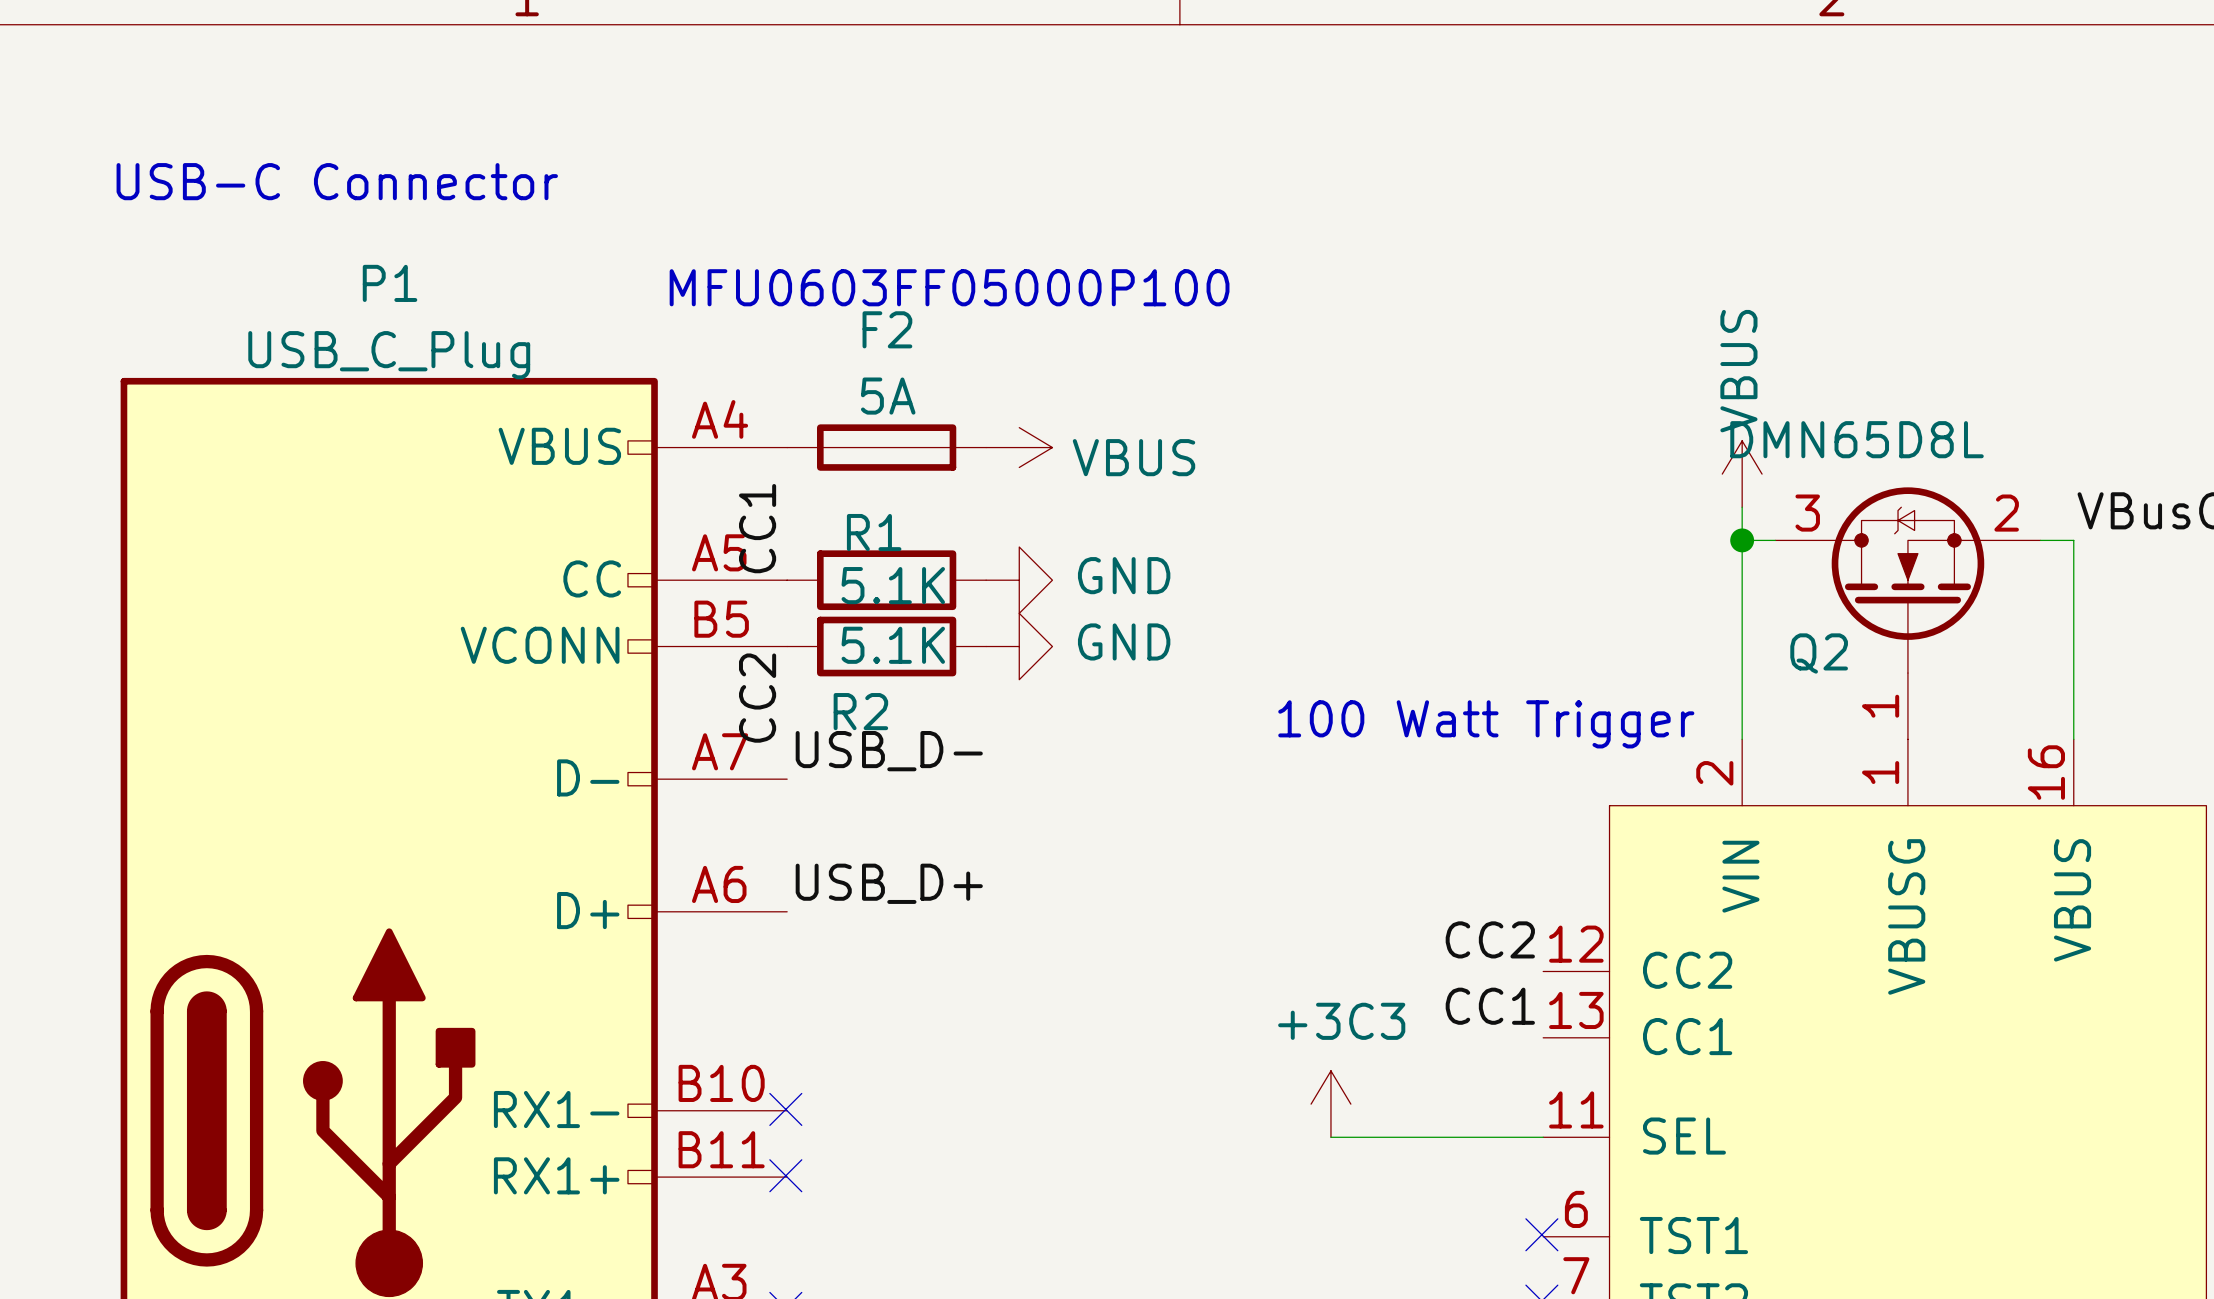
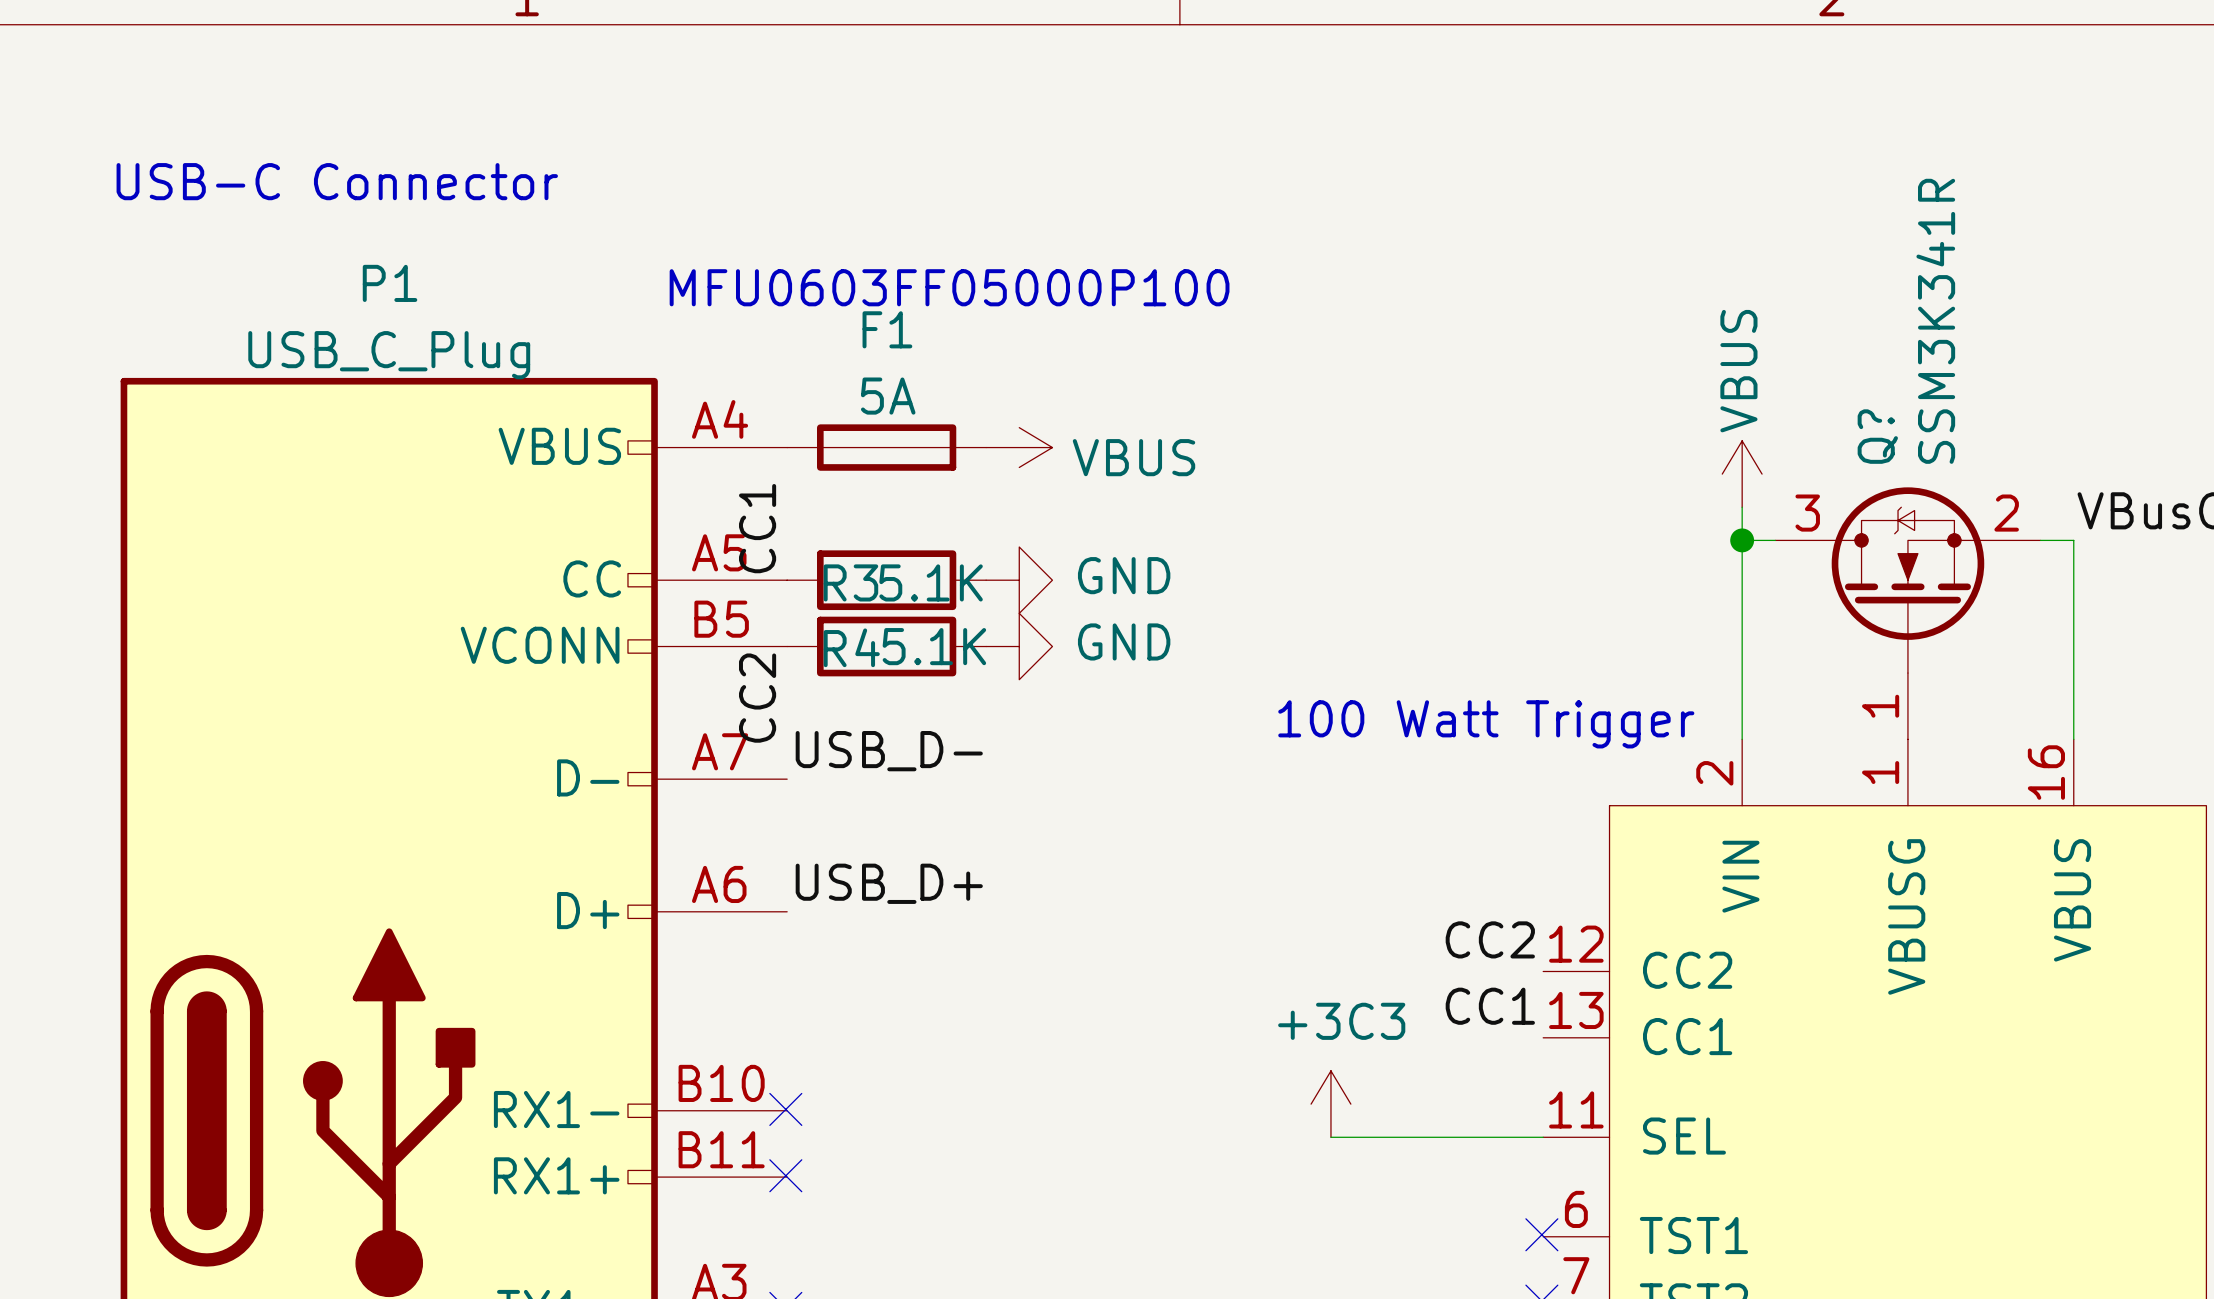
F2 name: F2 (887, 329) -> F1 (887, 329)
Q2 value: DMN65D8L (1857, 439) -> SSM3K341R (1935, 321)
R1 name: R1 (874, 532) -> R3 (850, 582)
R1 value position: 5.1K (893, 585) -> 5.1K (931, 582)
R2 value position: 5.1K (893, 645) -> 5.1K (934, 646)
Q2 name: Q2 (1819, 653) -> Q? (1877, 436)
R2 name: R2 (860, 711) -> R4 (851, 647)

